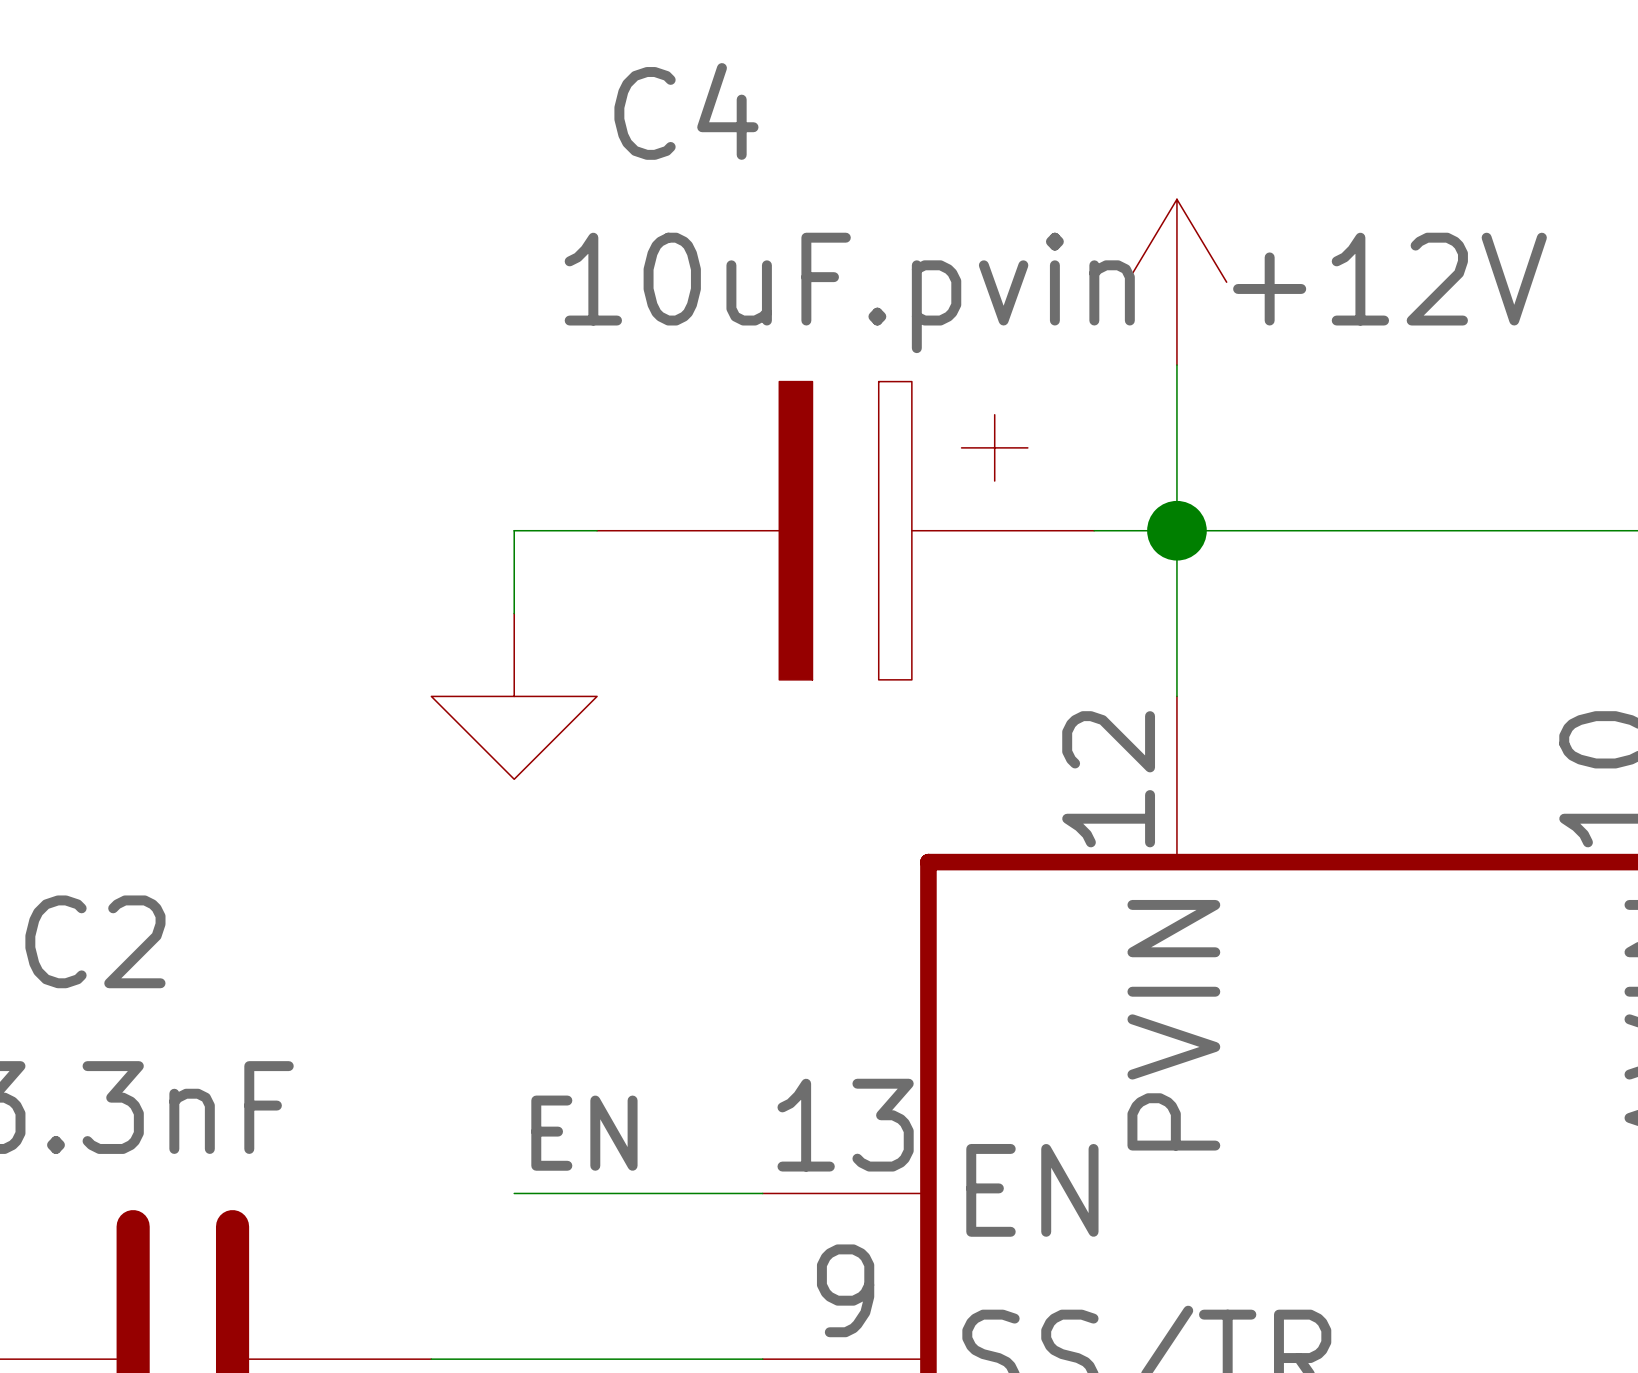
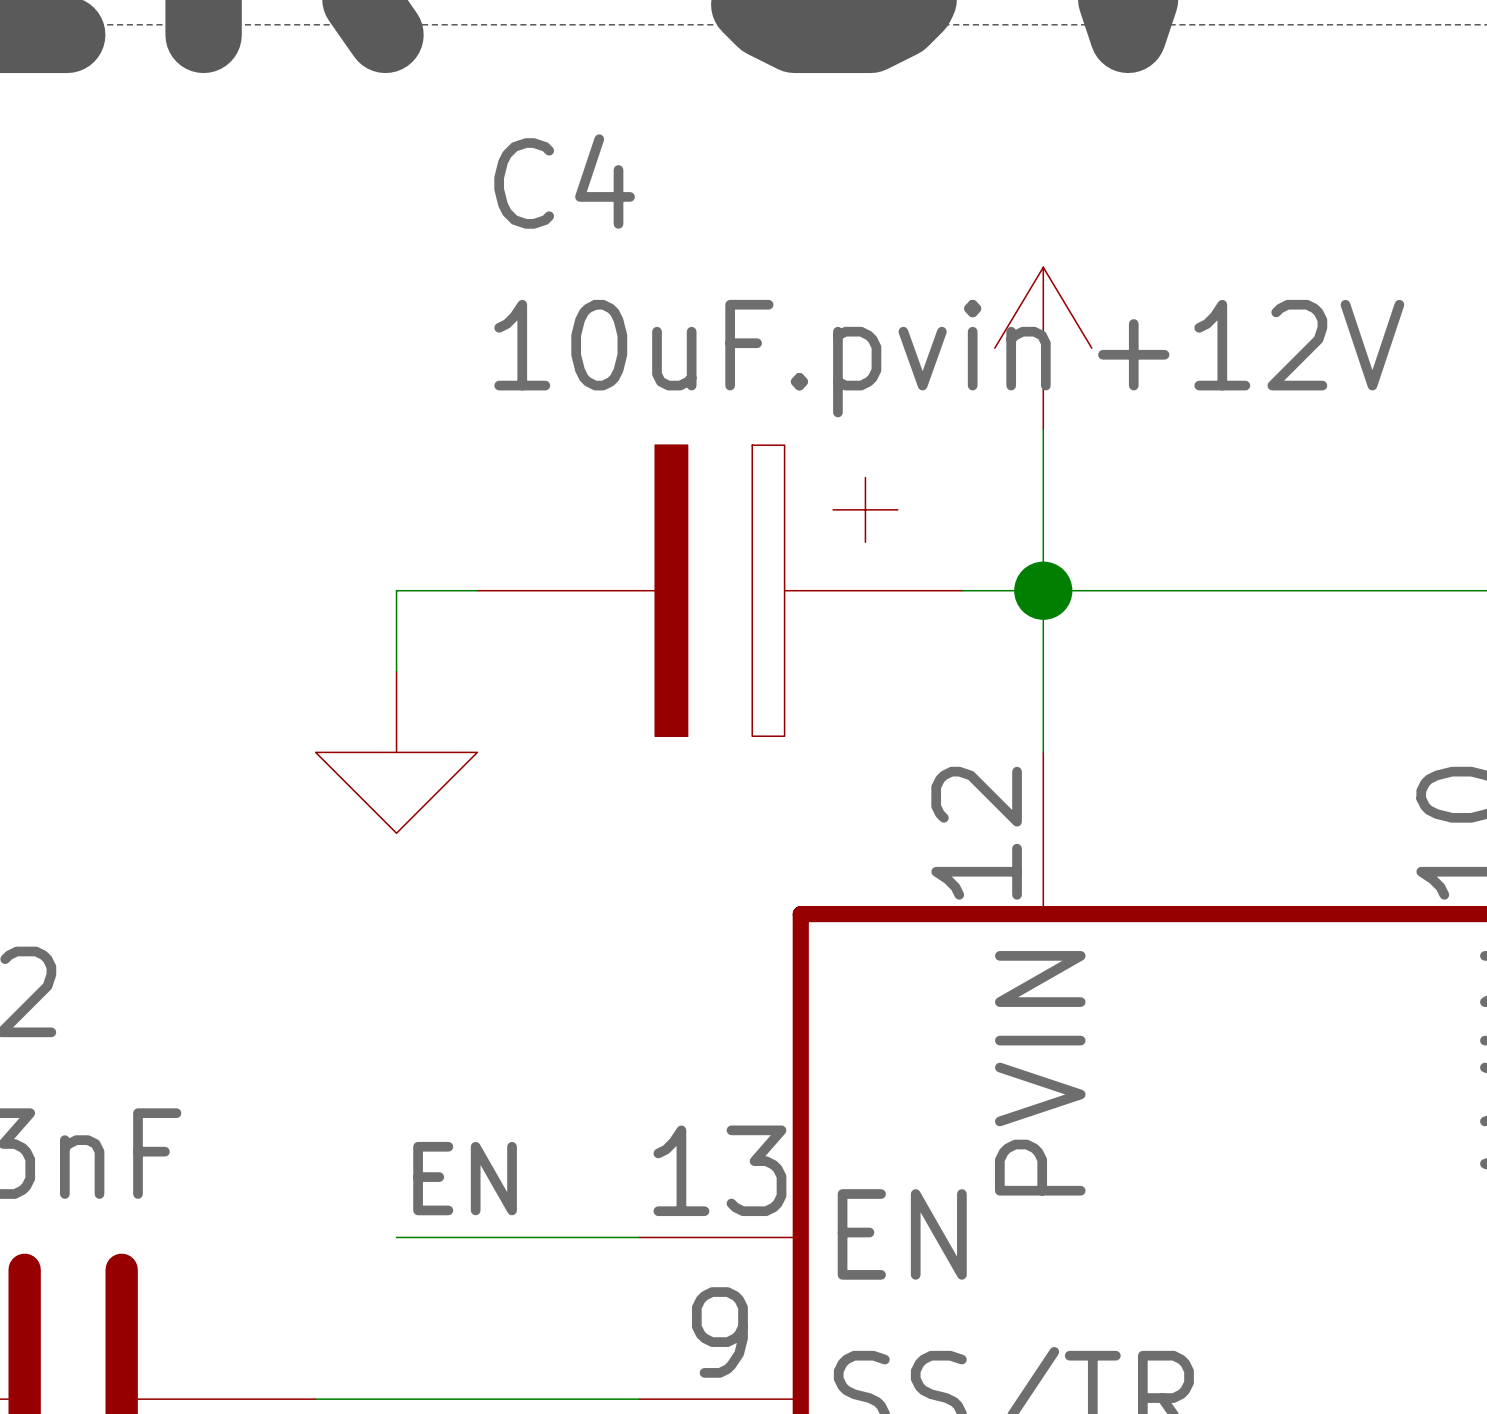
C4 value position: 10uF.pvin (849, 292) -> 10uF.pvin (772, 358)

